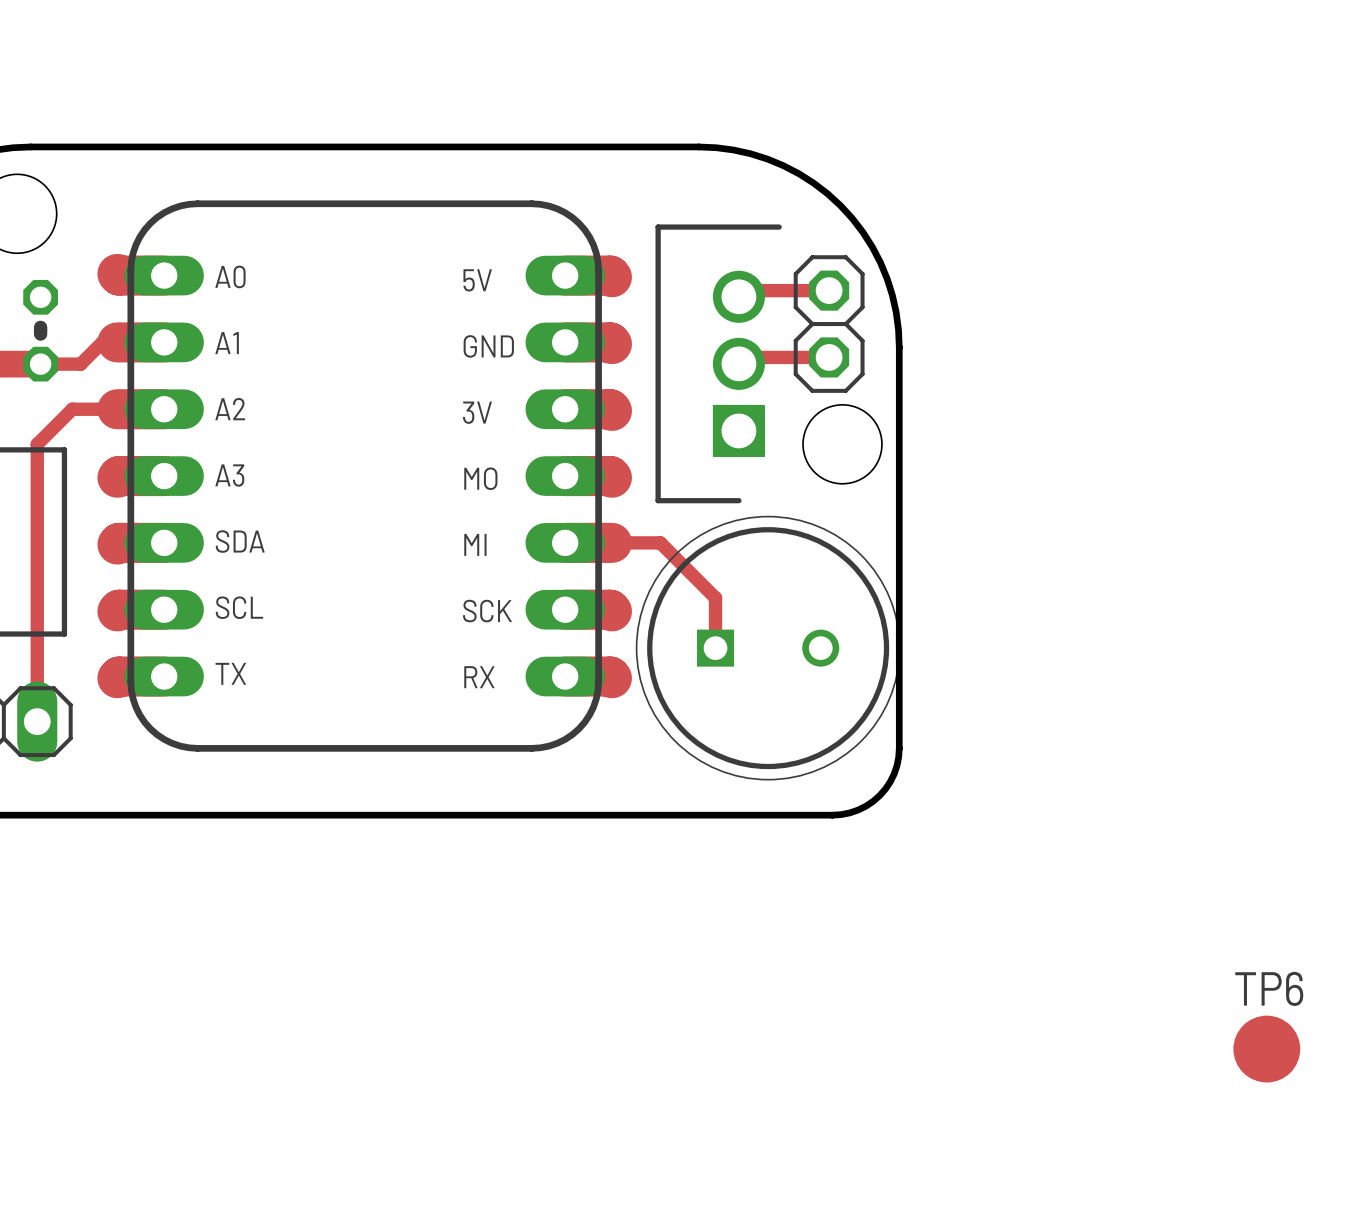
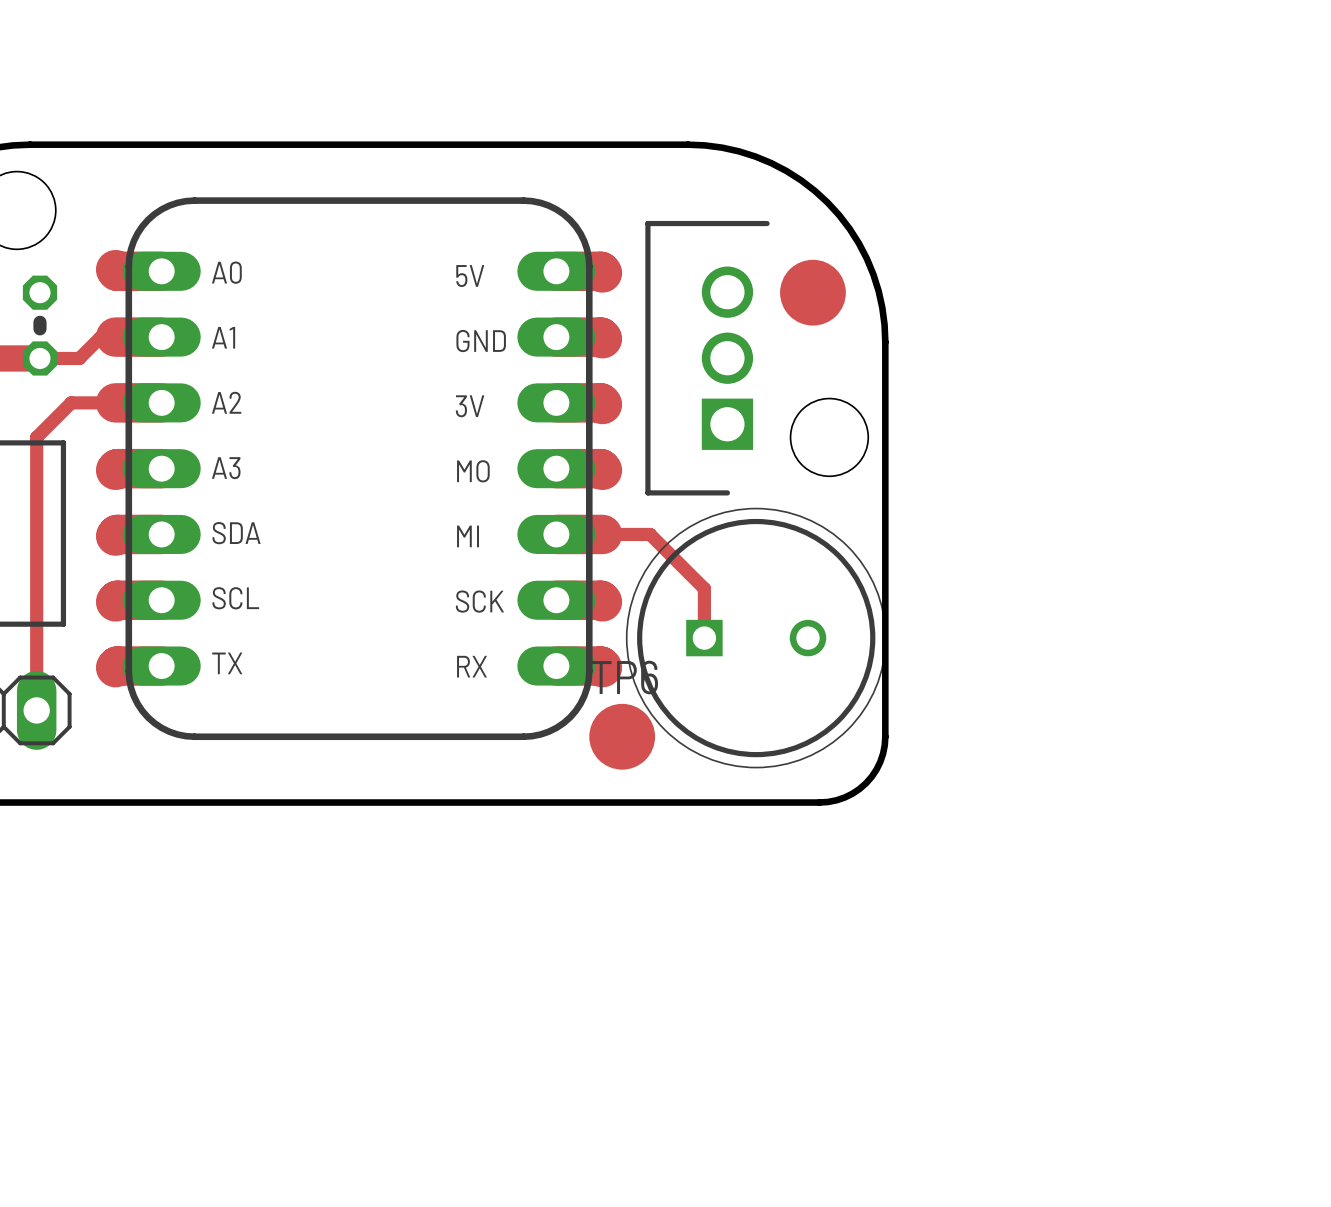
part footprint: [793, 255, 865, 327] -> [780, 259, 846, 326]
track: (829, 290) (745, 290) (738, 296) -> none
track: (829, 357) (745, 357) (738, 363) -> none
part: (829, 357) -> none
TP6 position: (1266, 1049) -> (622, 736)

